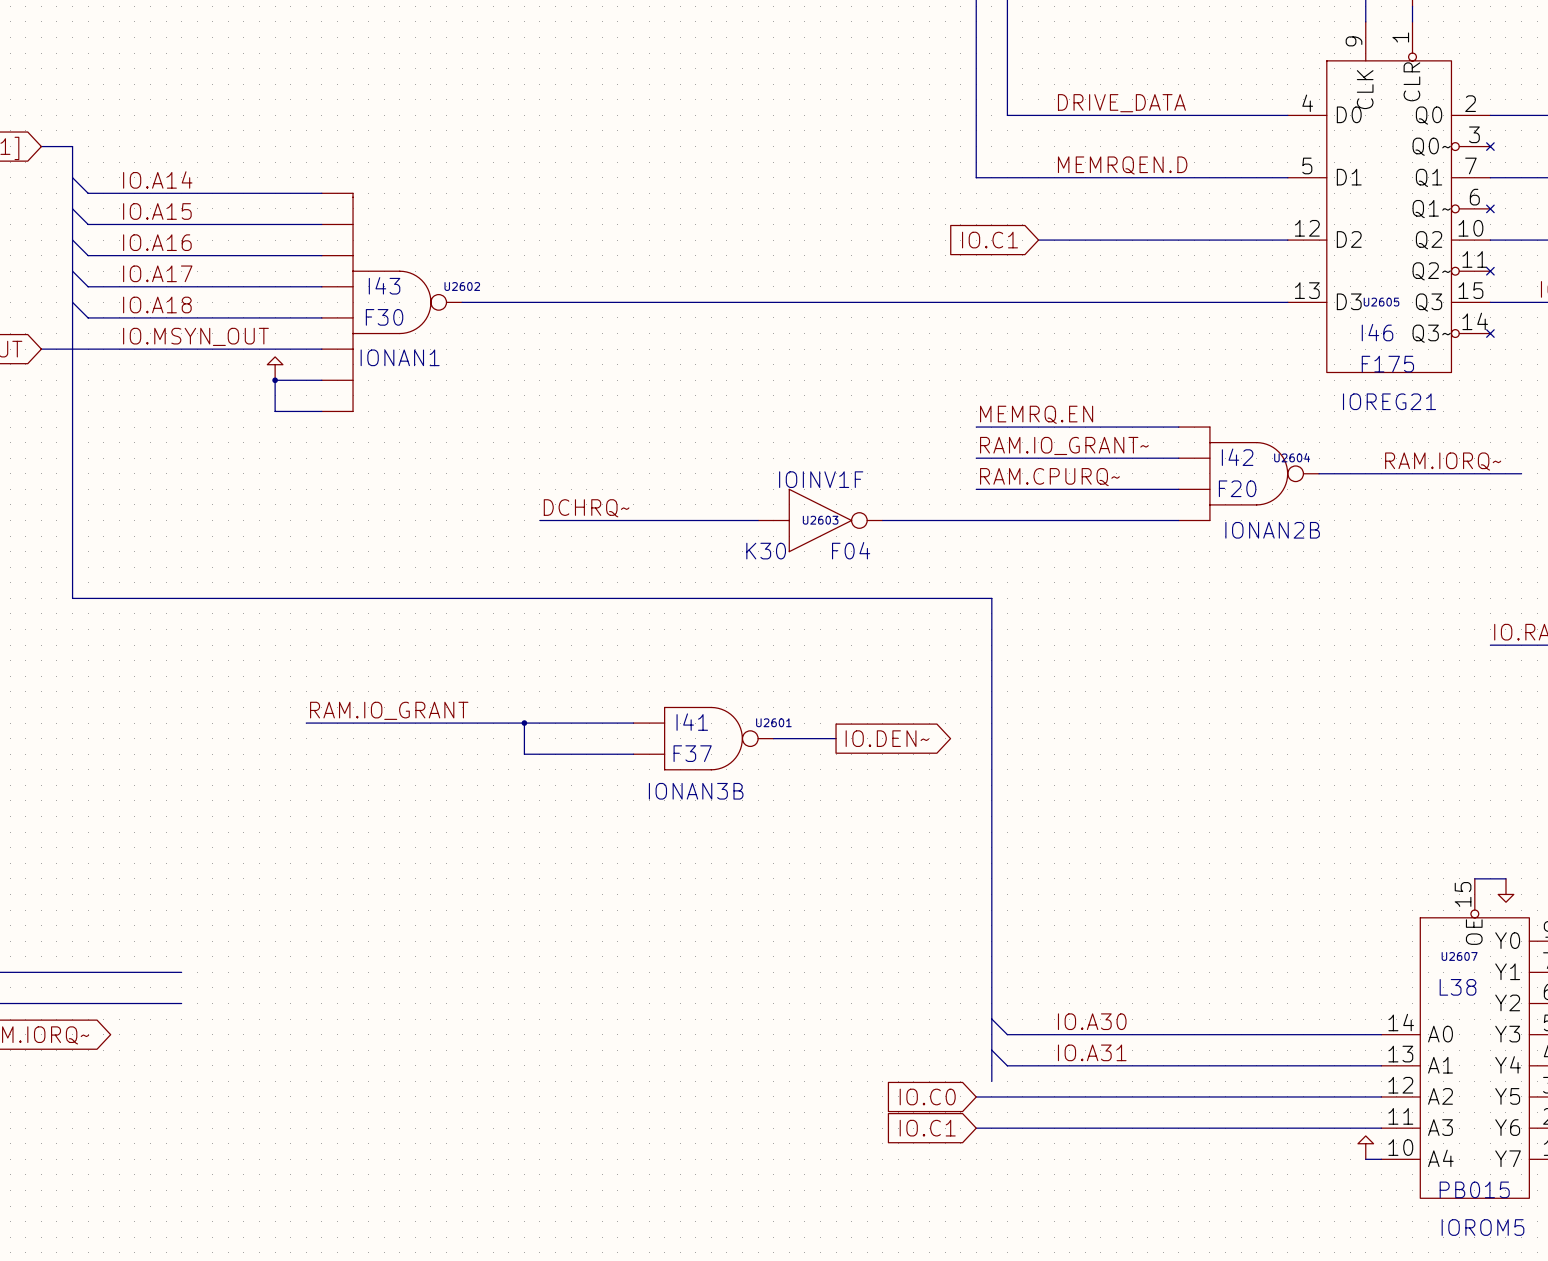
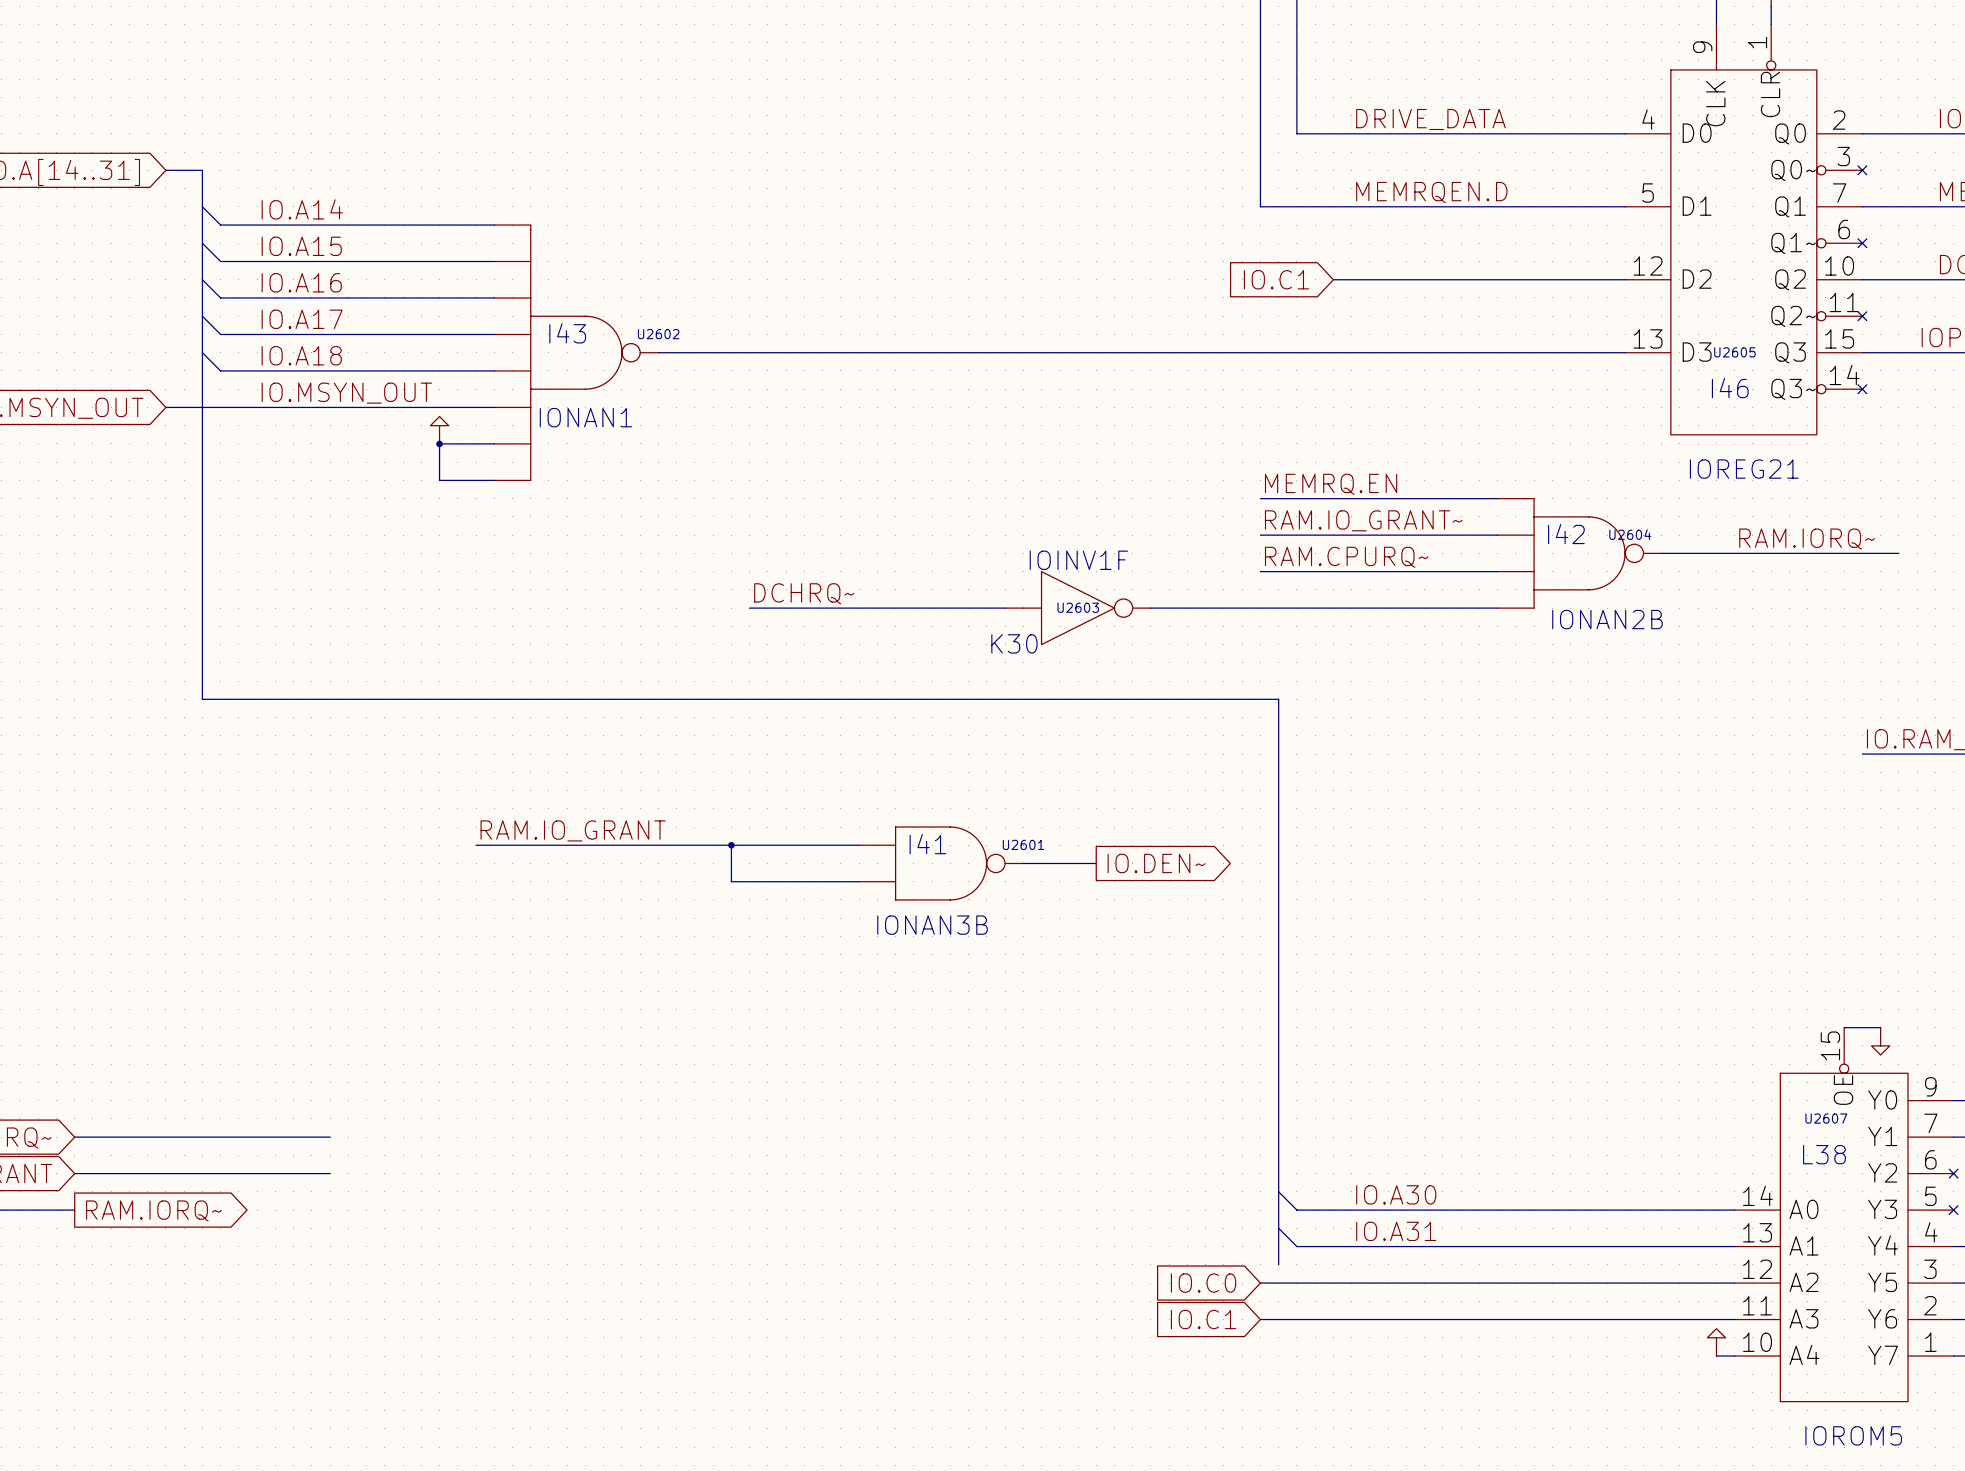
U2602 value: F30 (384, 317) -> none
U2605 value: F175 (1387, 364) -> none
U2604 value: F20 (1237, 488) -> none
U2603 value: F04 (851, 550) -> none
U2601 value: F37 (692, 753) -> none
U2607 value: PB015 (1474, 1189) -> none

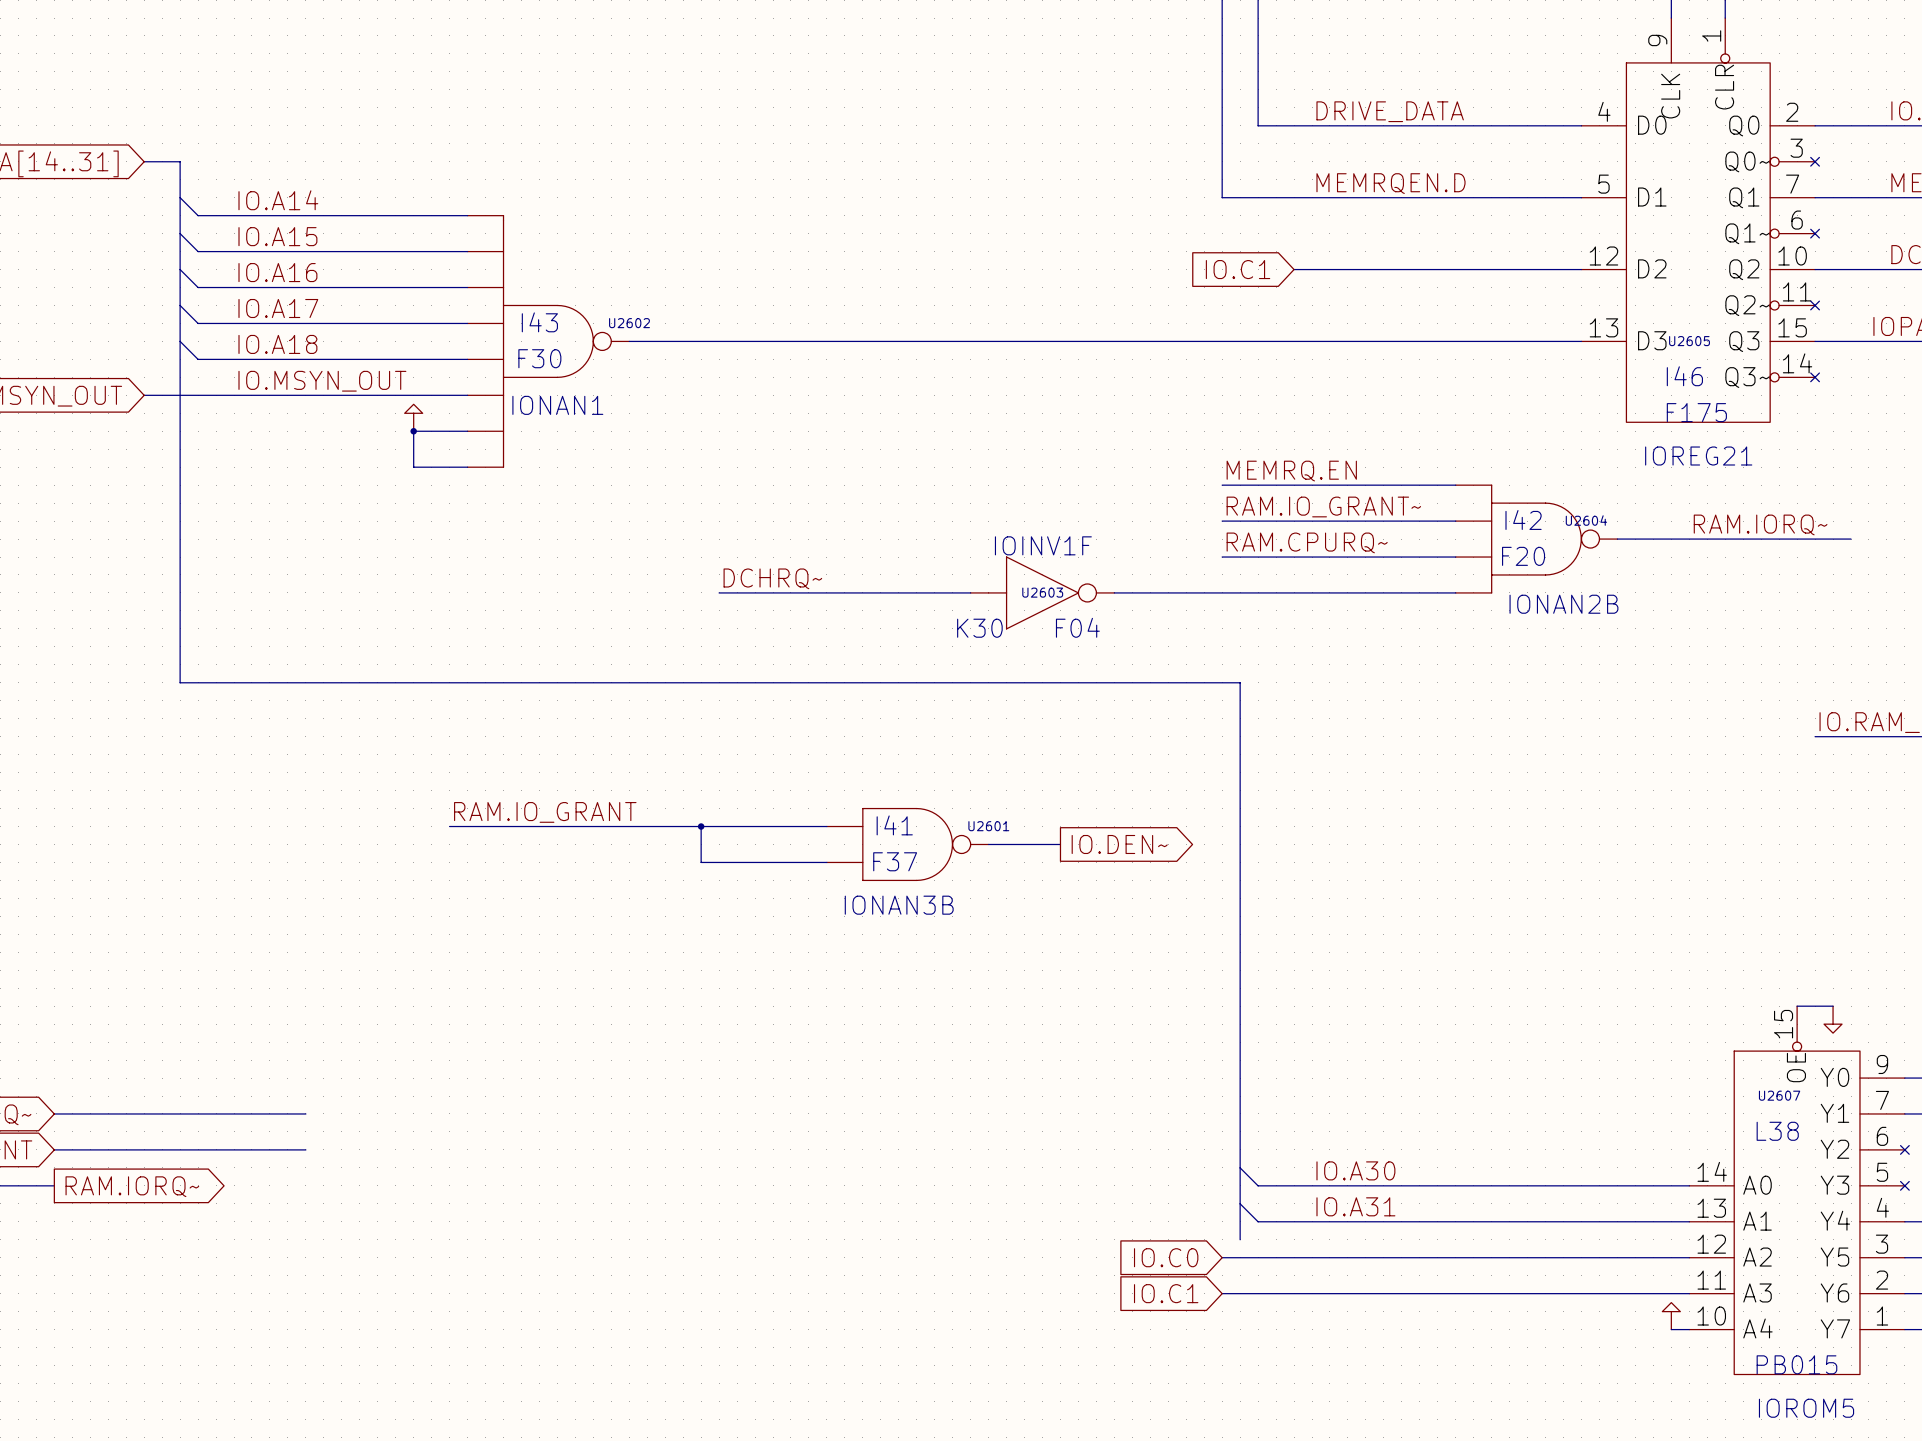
U2602 value: none -> F30 (539, 358)
U2605 value: none -> F175 (1696, 412)
U2604 value: none -> F20 (1523, 556)
U2603 value: none -> F04 (1077, 627)
U2601 value: none -> F37 (895, 861)
U2607 value: none -> PB015 (1796, 1364)

